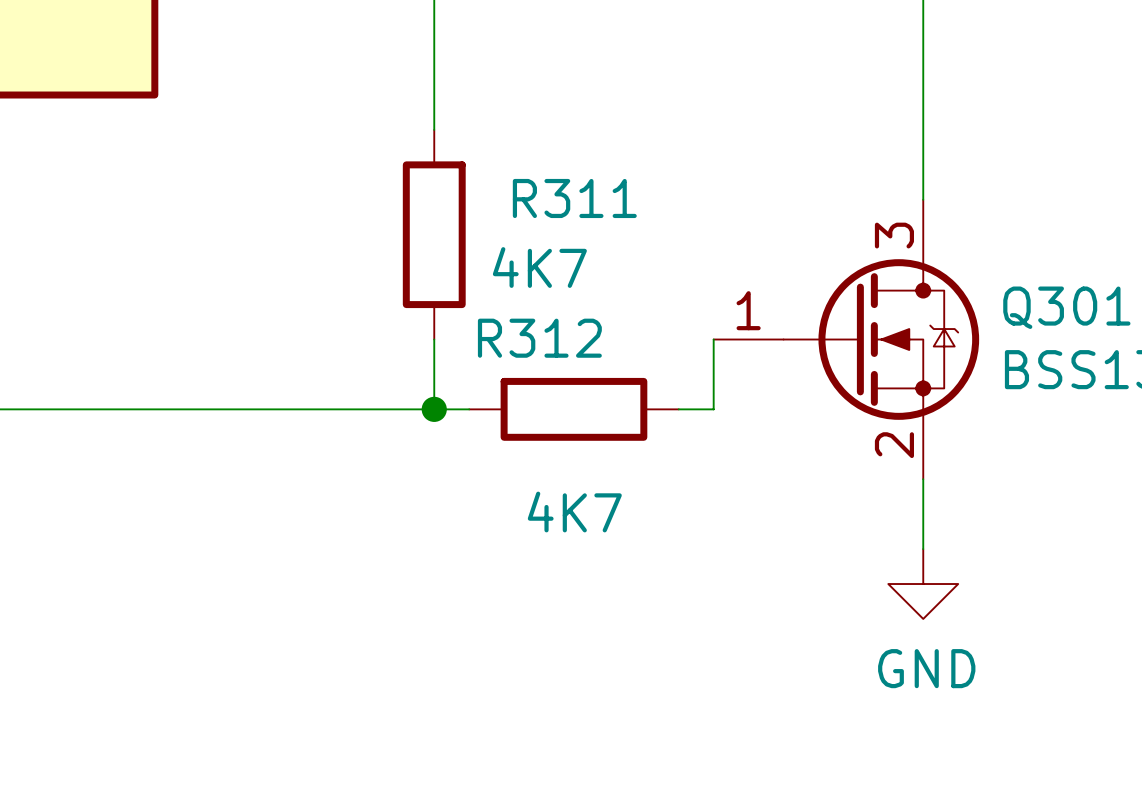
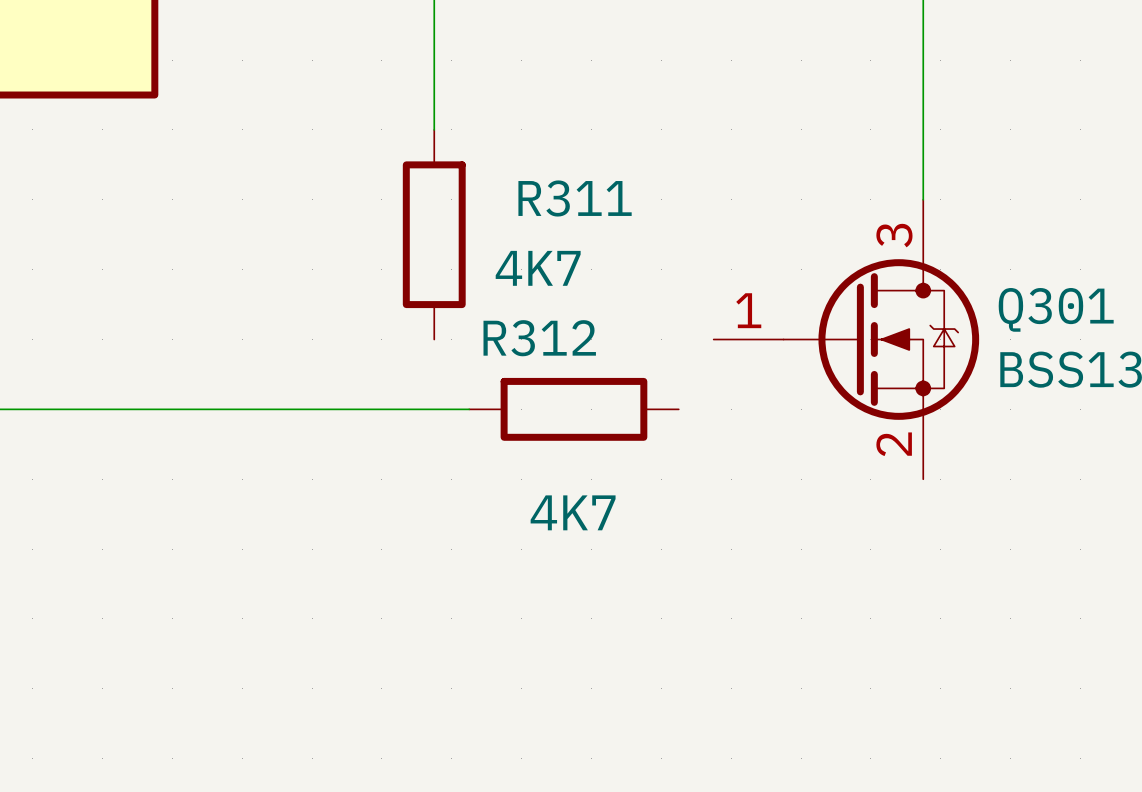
wire: (434, 339) (434, 409) -> none
wire: (713, 339) (713, 409) (678, 409) -> none
junction: (434, 409) -> none
wire: (923, 479) (923, 549) -> none
power symbol: GND (923, 584) -> none

